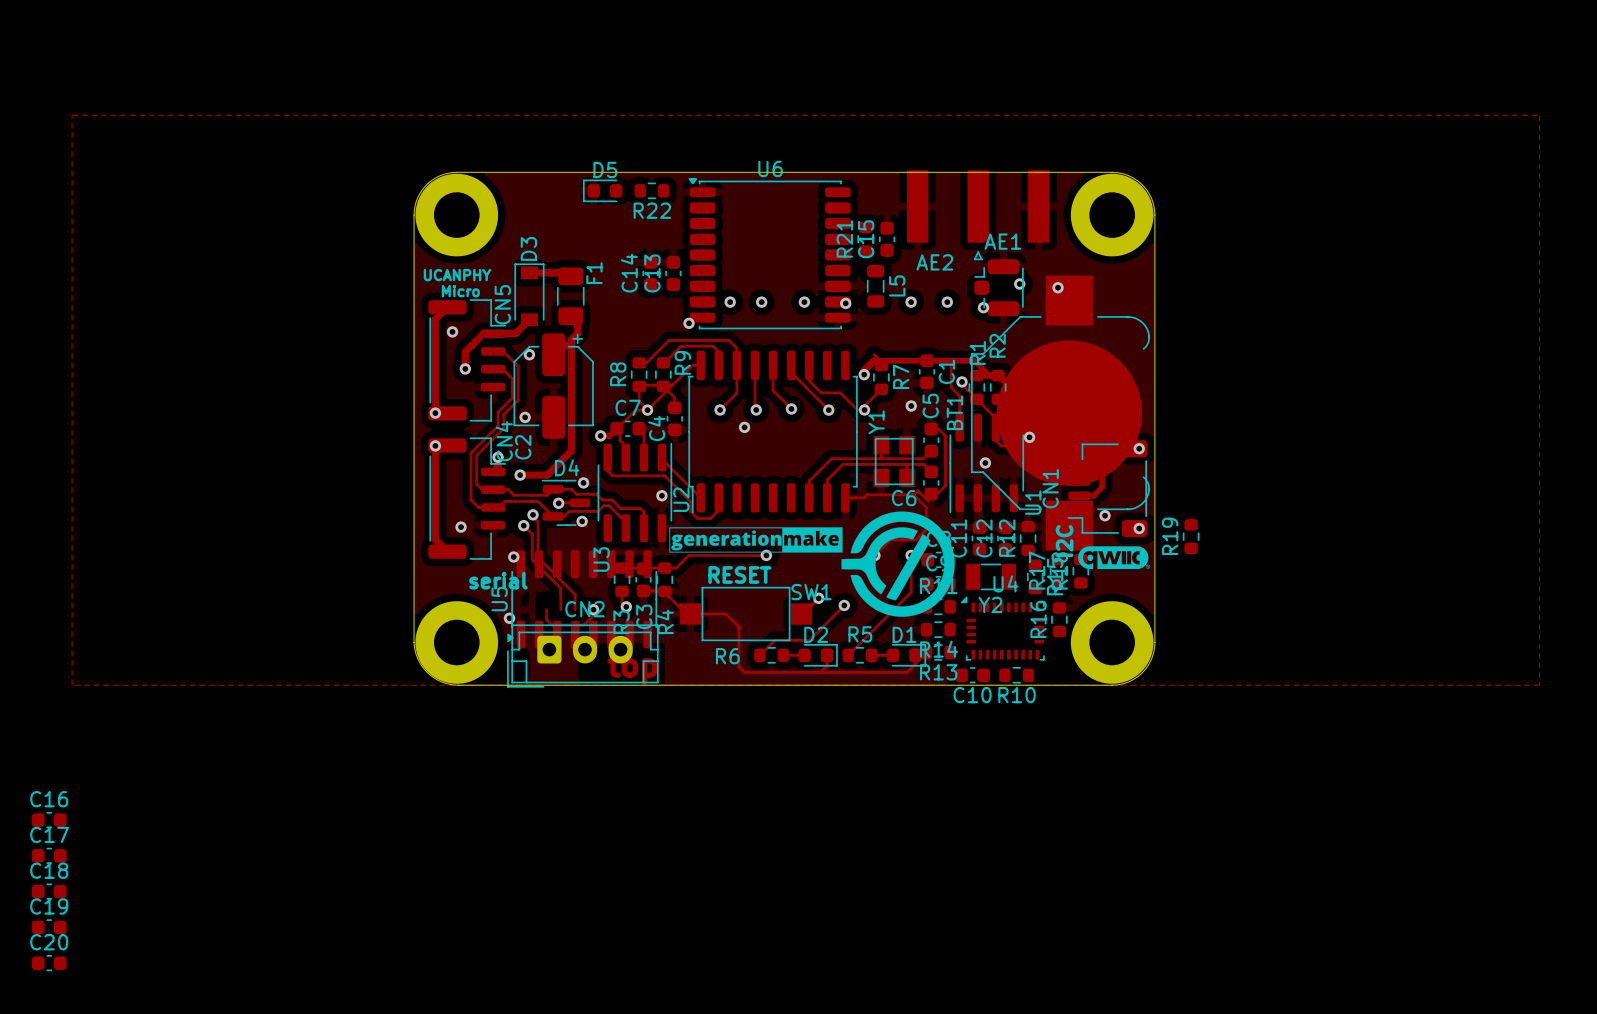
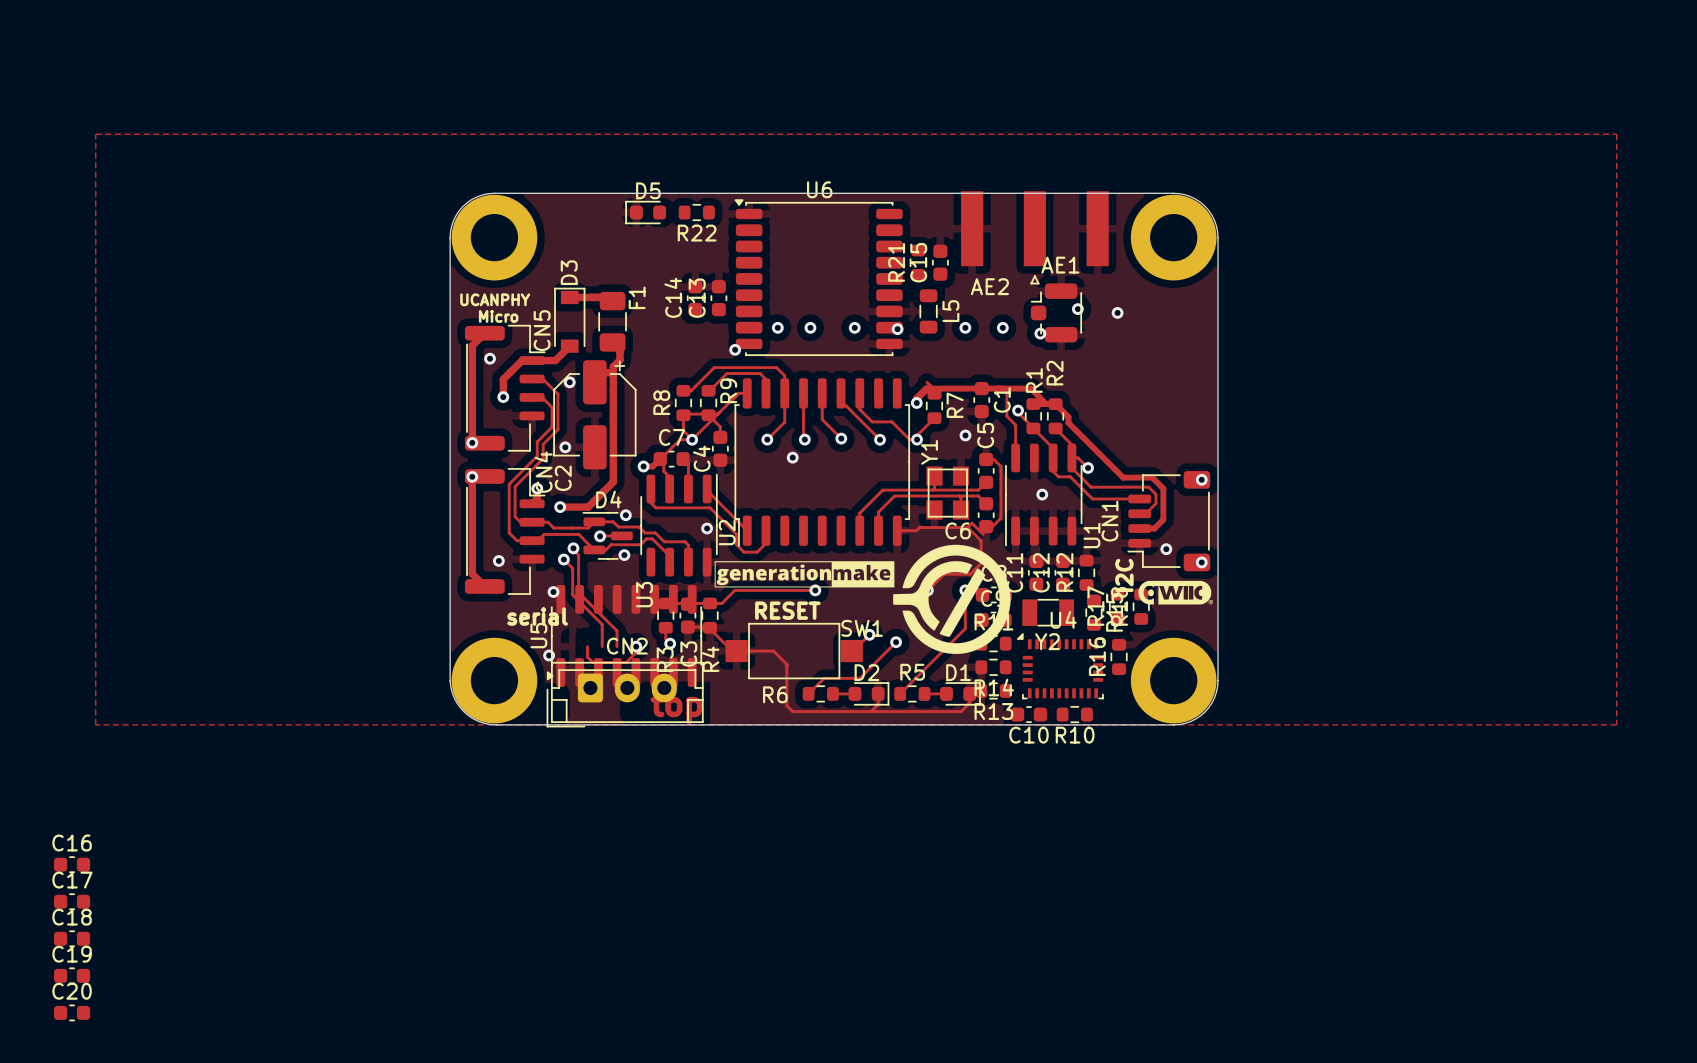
BT1: (1060, 413) -> none
R19: (1191, 536) -> none

